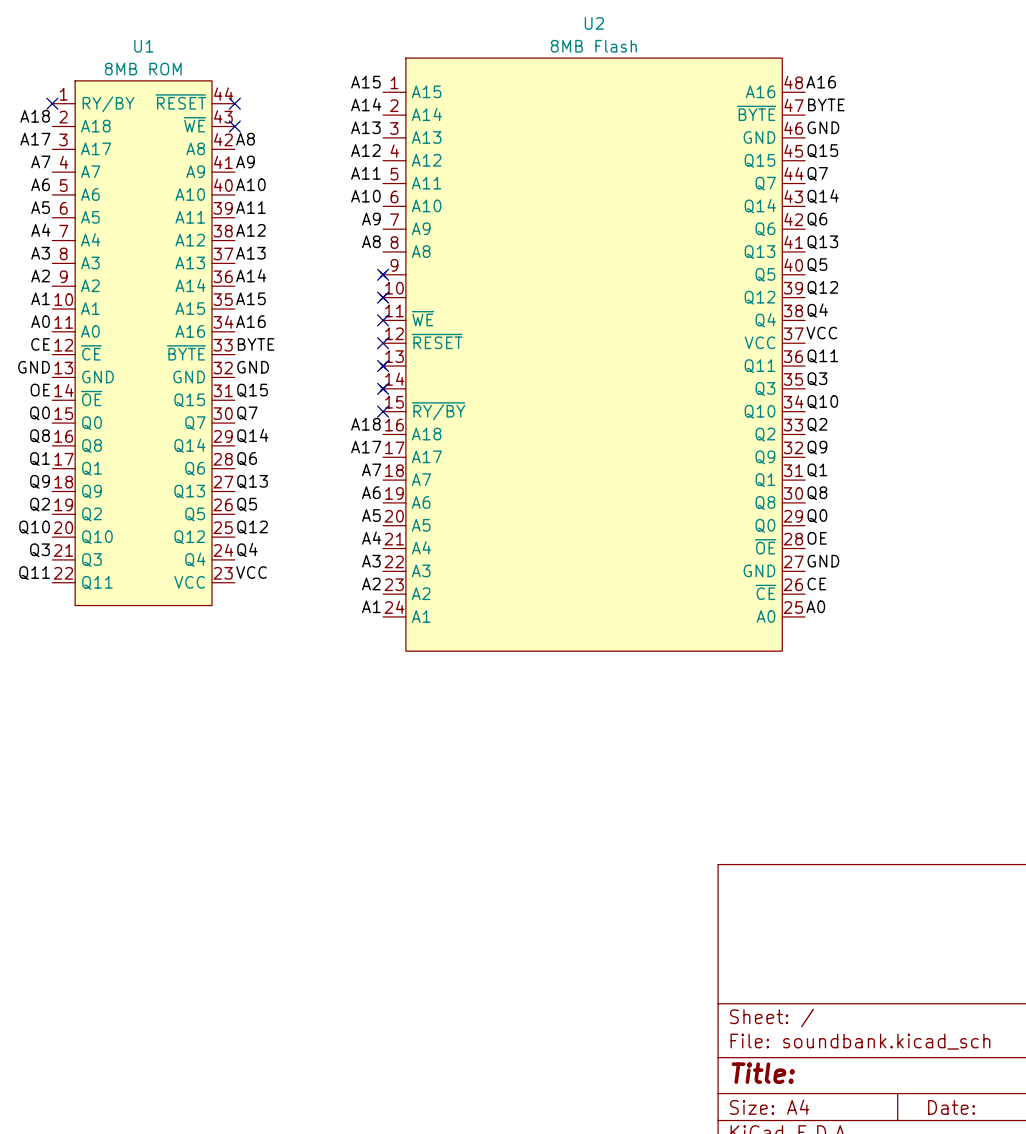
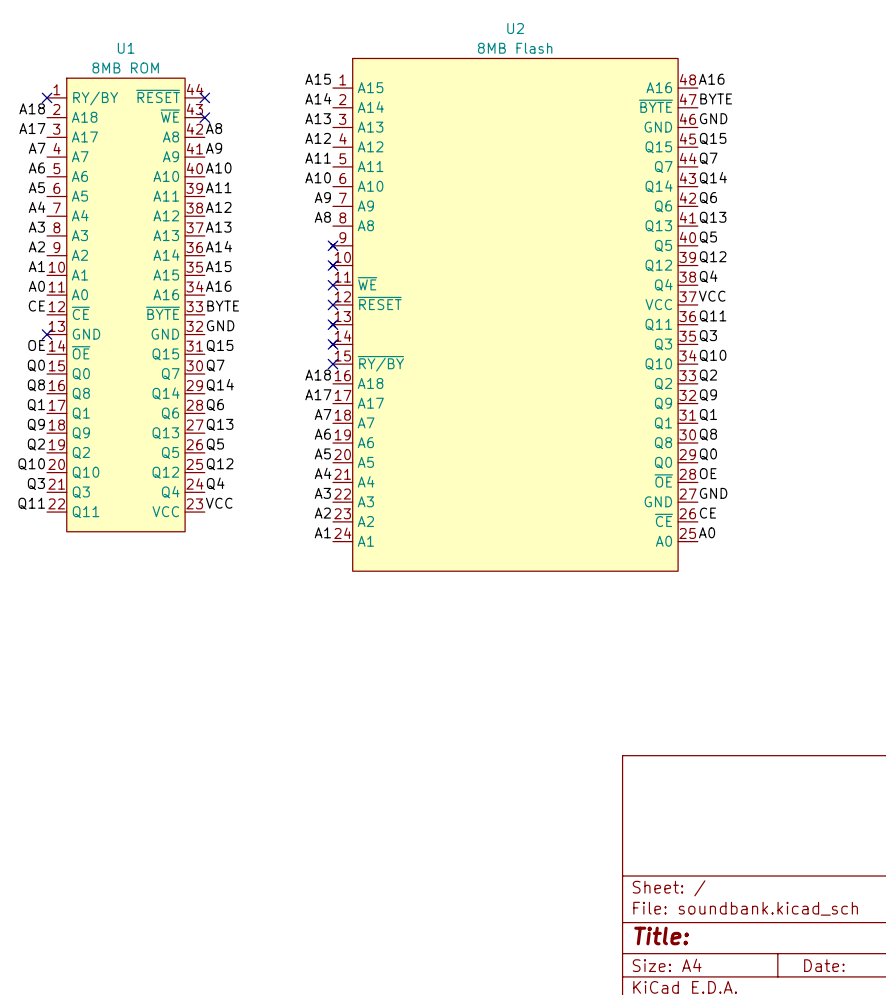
label: GND (34, 367) -> none
no-connect mark: none -> (47, 334)

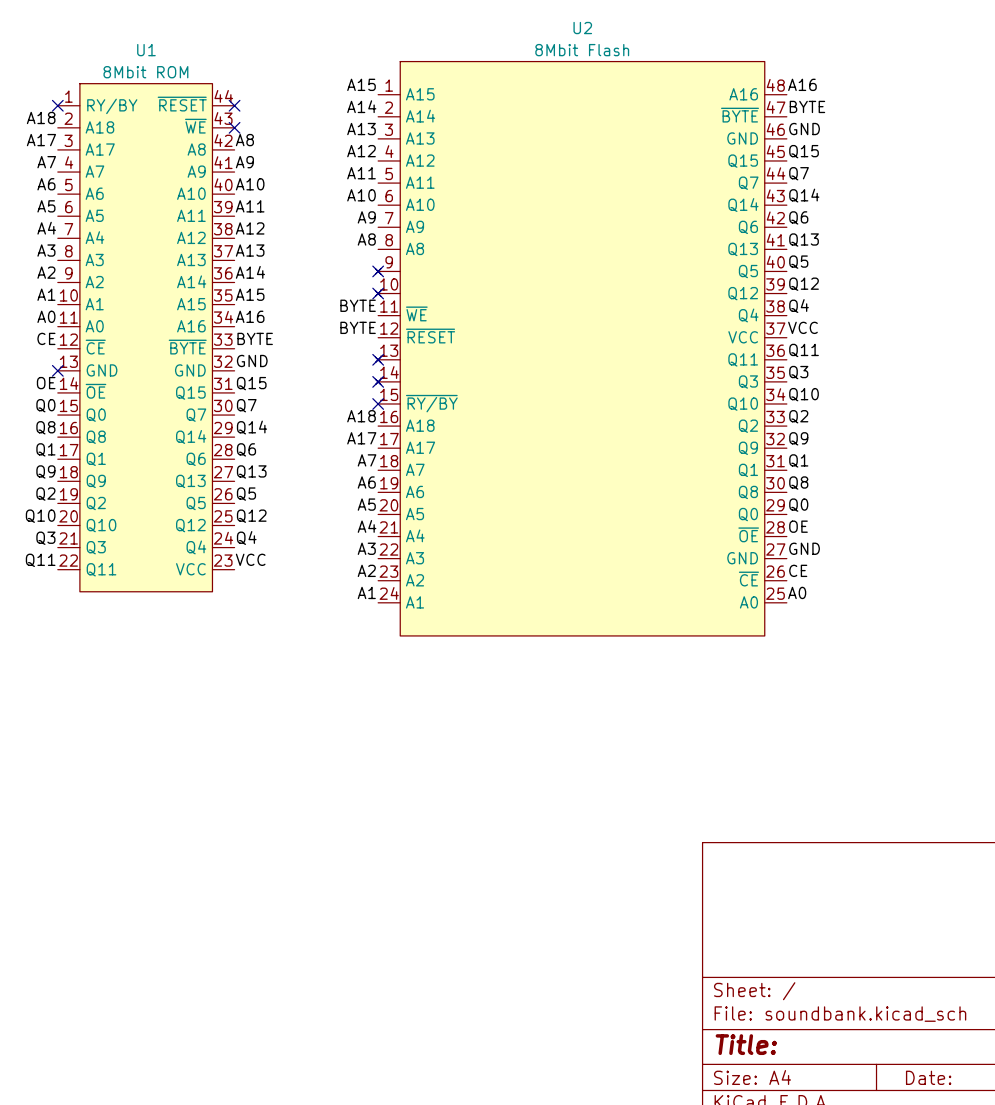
U2 value: 8MB Flash (515, 48) -> 8Mbit Flash (582, 50)
U1 value: 8MB ROM (125, 67) -> 8Mbit ROM (145, 72)
label: none -> BYTE (358, 305)
no-connect mark: (332, 285) -> none
label: none -> BYTE (358, 327)
no-connect mark: (332, 304) -> none

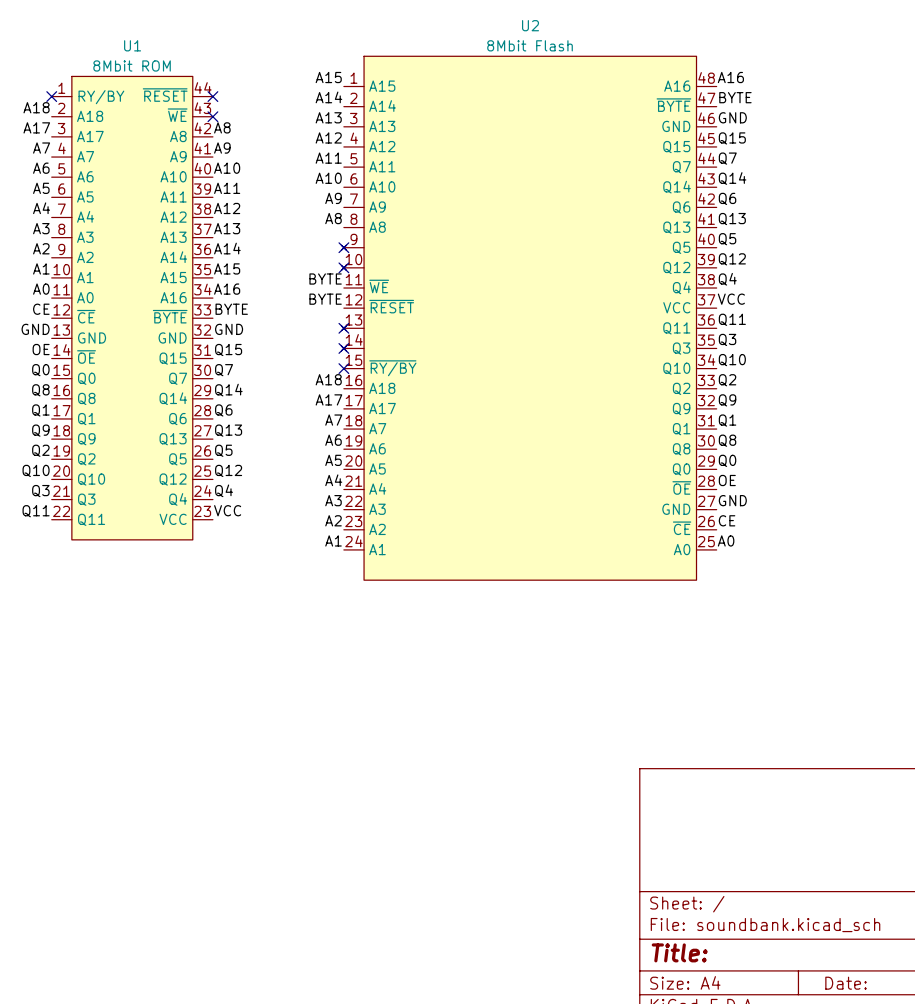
label: none -> GND (35, 329)
no-connect mark: (57, 370) -> none

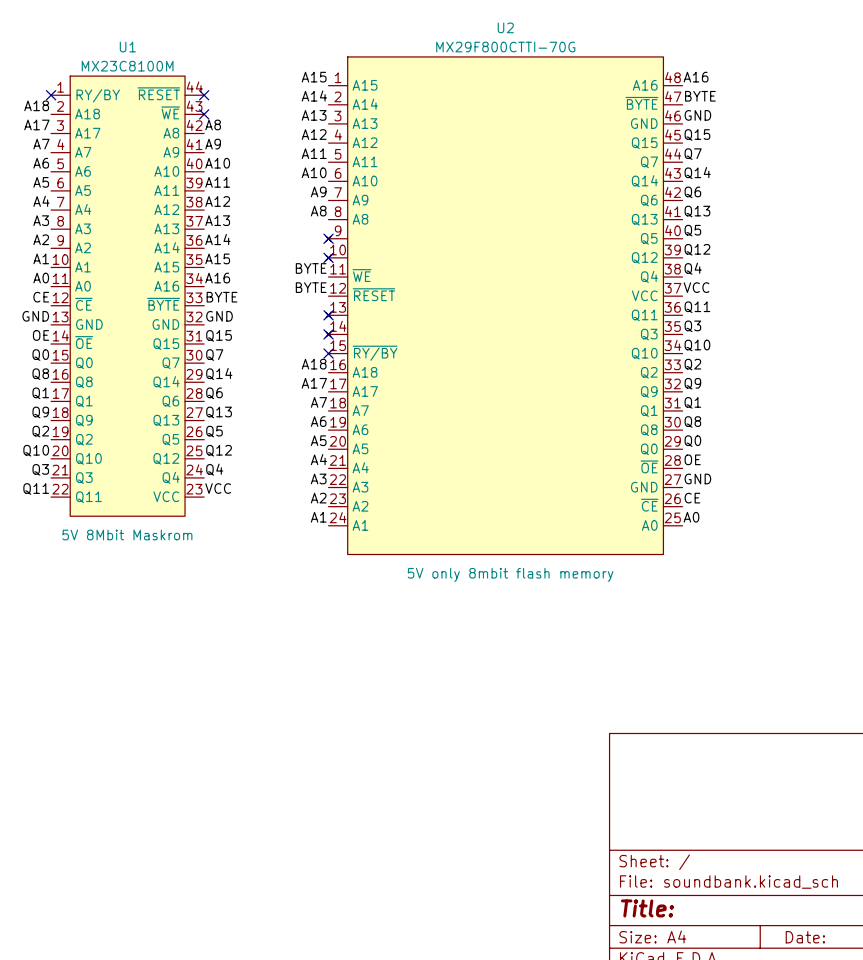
U2 value: 8Mbit Flash (530, 45) -> MX29F800CTTI-70G (505, 47)
U1 value: 8Mbit ROM (132, 65) -> MX23C8100M (127, 66)
U1 text: none -> 5V 8Mbit Maskrom (127, 535)
U2 text: none -> 5V only 8mbit flash memory (510, 574)

